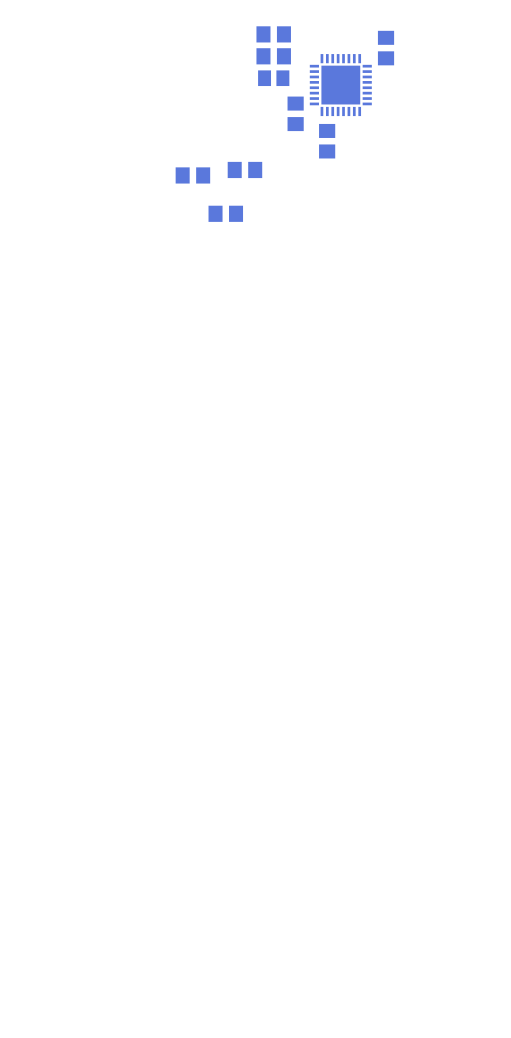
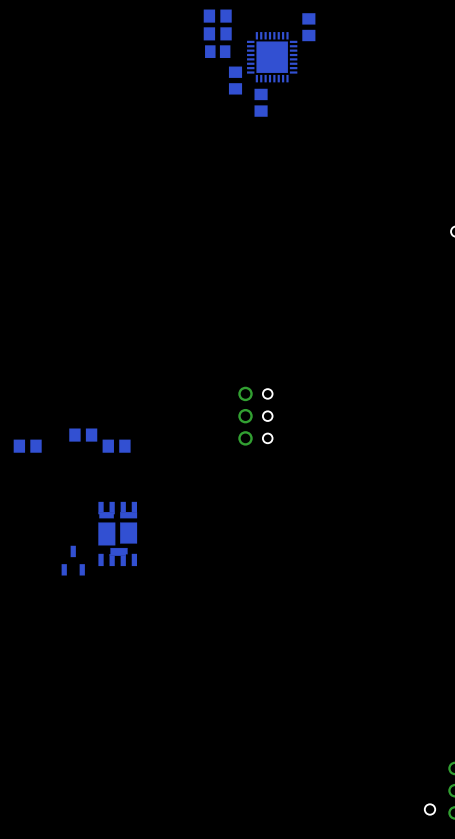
part: (244, 169) -> none
part: (192, 175) -> none
part: (225, 213) -> none
part: none -> (255, 416)
part: none -> (83, 435)
part: none -> (27, 446)
part: none -> (116, 446)
part: none -> (117, 533)
part: none -> (73, 560)

